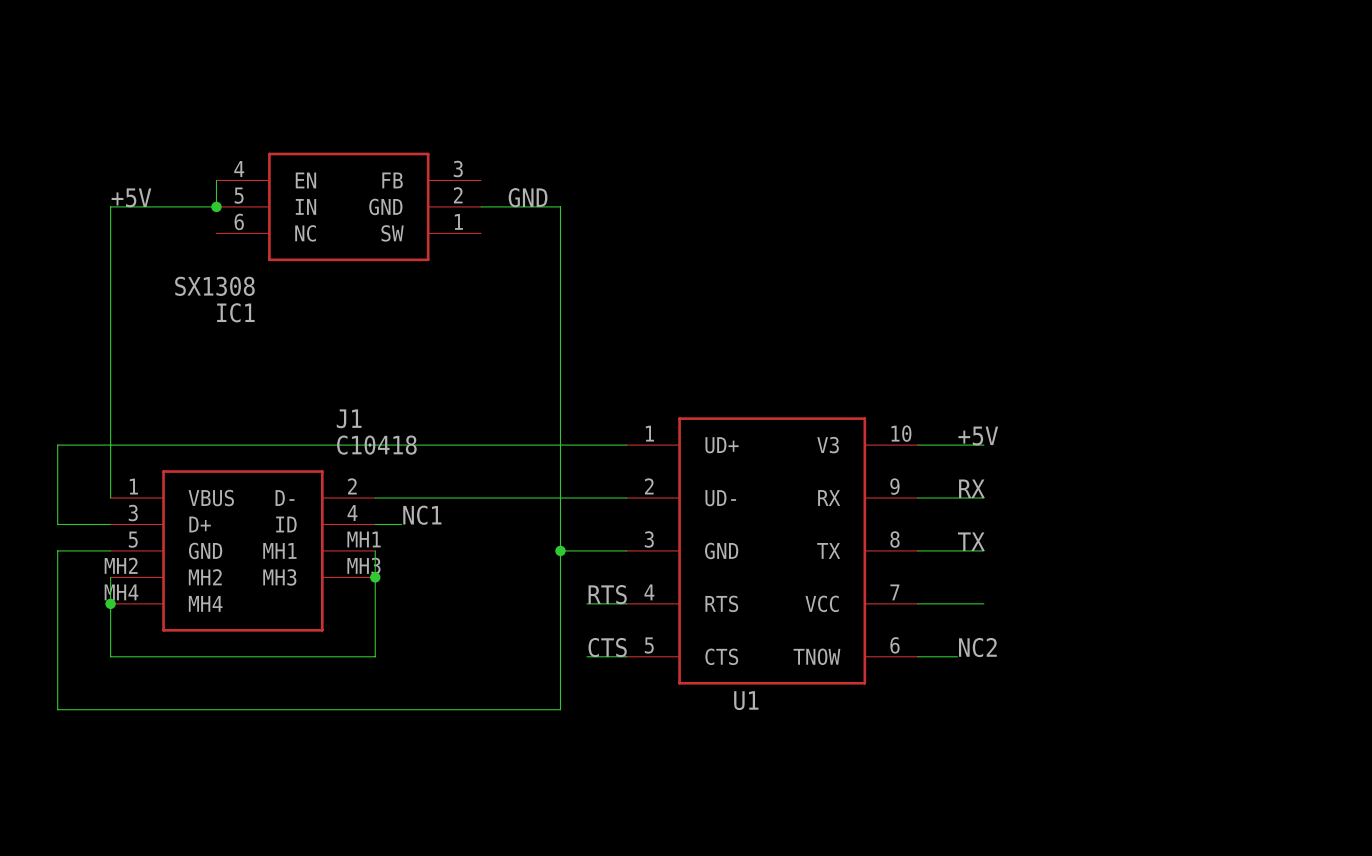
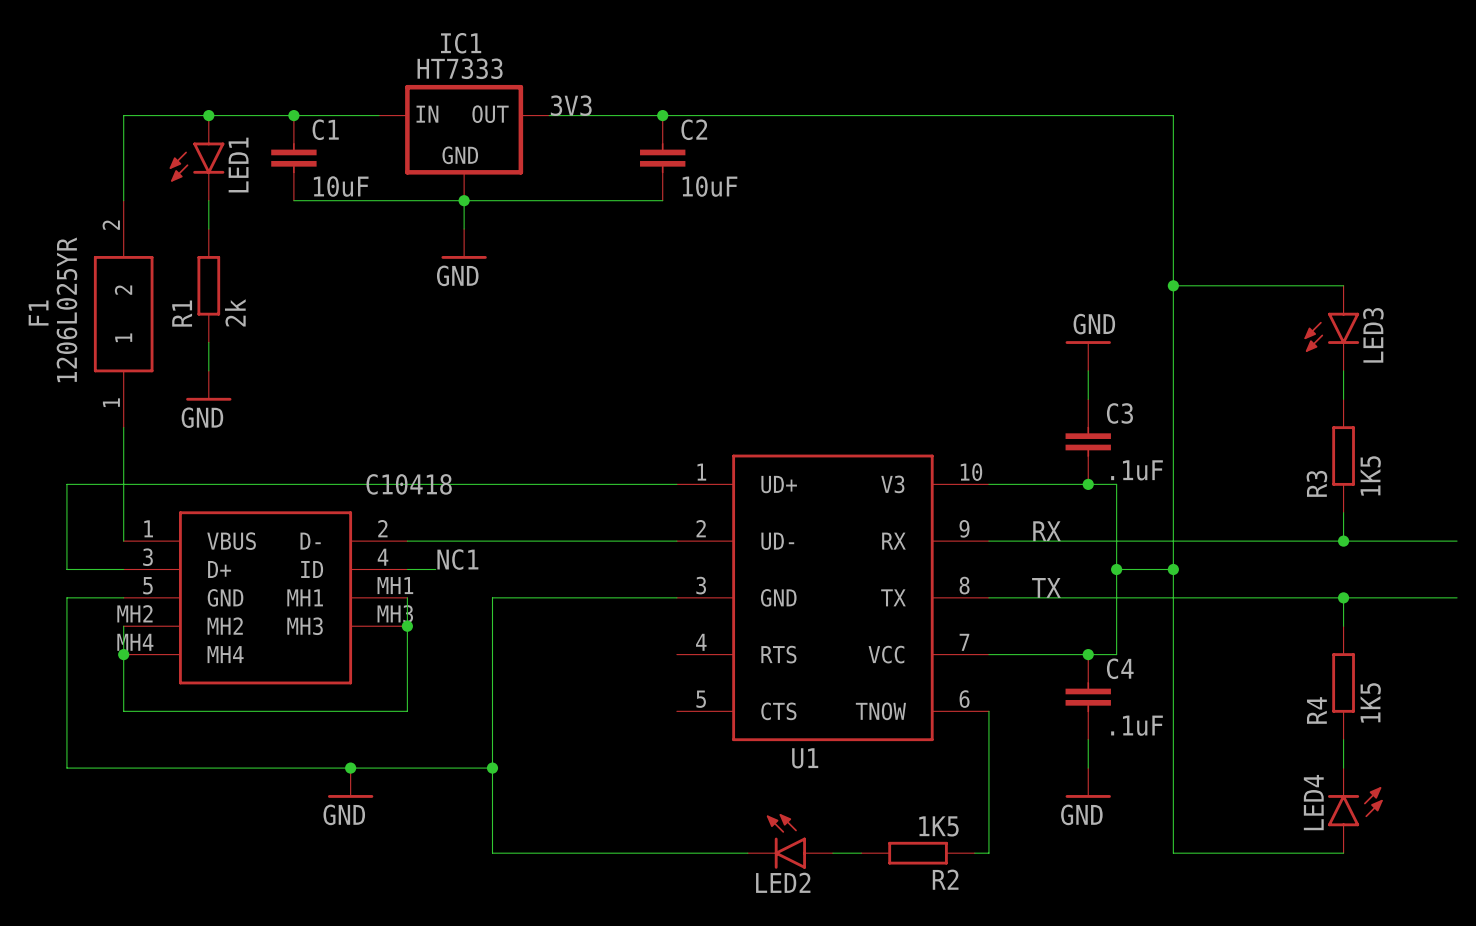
label: none -> 3V3 (571, 105)
junction: none -> (208, 115)
junction: none -> (293, 115)
wire: none -> (379, 115) (123, 115) (123, 200)
wire: none -> (549, 115) (1173, 115) (1173, 853) (1343, 853)
junction: none -> (662, 115)
LED1: none -> (197, 158)
C1: none -> 10uF (293, 158)
C2: none -> 10uF (662, 158)
IC1 symbol: [216, 152, 482, 262] -> [379, 84, 550, 201]
wire: none -> (208, 200) (208, 229)
wire: (216, 180) (216, 206) (110, 206) (110, 392) -> none
wire: none -> (293, 200) (662, 200)
junction: none -> (464, 200)
label: +5V (131, 197) -> none
label: GND (528, 197) -> none
junction: (216, 206) -> none
wire: (481, 206) (560, 206) (560, 709) (454, 709) -> none
power symbol: none -> GND (464, 243)
R1: none -> 2k (208, 285)
wire: none -> (1173, 285) (1343, 285)
junction: none -> (1173, 285)
F1: none -> 1206L025YR (123, 314)
IC1 value: SX1308 (214, 286) -> HT7333 (460, 68)
LED3: none -> (1331, 328)
wire: none -> (208, 342) (208, 370)
IC1 name position: IC1 (235, 312) -> IC1 (461, 43)
power symbol: none -> GND (1088, 356)
wire: none -> (1088, 370) (1088, 399)
wire: none -> (1343, 370) (1343, 399)
power symbol: none -> GND (208, 385)
C3: none -> .1uF (1088, 441)
J1 name: J1 (349, 418) -> none
R3: none -> 1K5 (1343, 456)
label: +5V (978, 436) -> none
wire: none -> (1059, 484) (1116, 484) (1116, 654) (1059, 654)
junction: none -> (1088, 484)
wire: none -> (1343, 512) (1343, 541)
wire: none -> (1059, 541) (1457, 541)
junction: none -> (1343, 541)
wire: none -> (1116, 569) (1173, 569)
junction: none -> (1116, 569)
junction: none -> (1173, 569)
wire: none -> (605, 597) (492, 597) (492, 853) (747, 853)
junction: (560, 550) -> none
wire: none -> (1059, 597) (1457, 597)
wire: none -> (1343, 597) (1343, 626)
junction: none -> (1343, 597)
label: RTS (607, 594) -> none
wire: (586, 603) (626, 603) -> none
junction: none -> (1088, 654)
R4: none -> 1K5 (1343, 682)
C4: none -> .1uF (1088, 697)
label: CTS (607, 647) -> none
label: NC2 (977, 647) -> none
wire: (586, 656) (626, 656) -> none
wire: (917, 656) (957, 656) -> (988, 711) (988, 853) (974, 853)
wire: none -> (1088, 739) (1088, 768)
wire: none -> (1343, 739) (1343, 768)
junction: none -> (350, 768)
junction: none -> (492, 768)
power symbol: none -> GND (350, 782)
power symbol: none -> GND (1088, 782)
LED4: none -> (1355, 810)
LED2: none -> (790, 841)
wire: none -> (832, 853) (861, 853)
R2: none -> 1K5 (918, 853)

